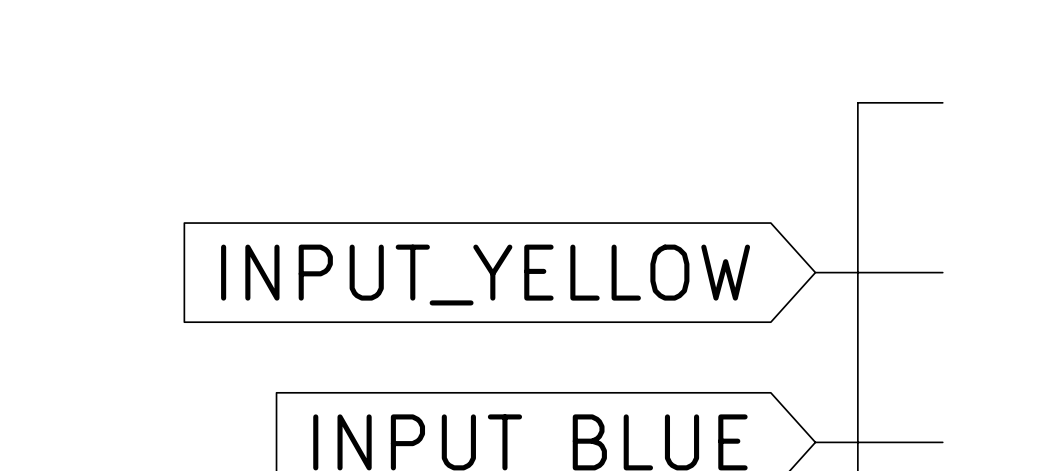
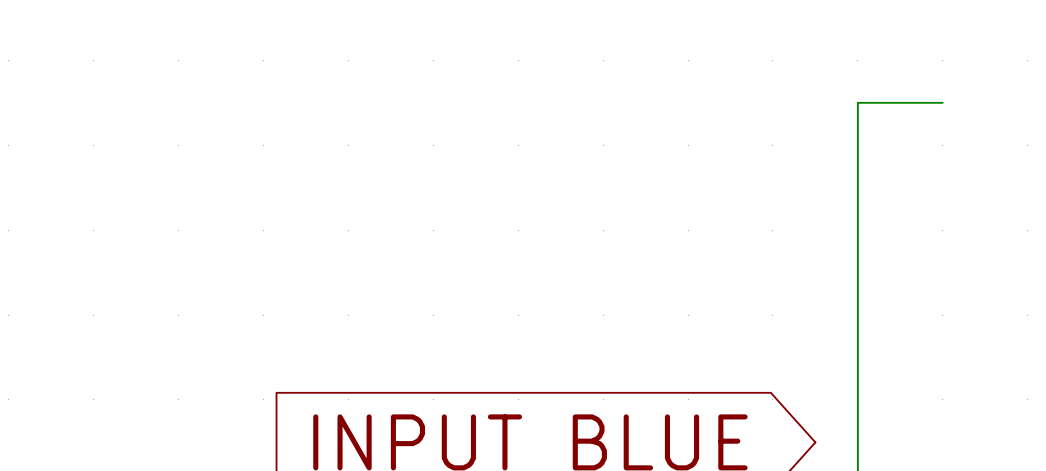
wire: (815, 272) (942, 272) -> none
global label: INPUT_YELLOW (485, 275) -> none
wire: (815, 442) (942, 442) -> none

